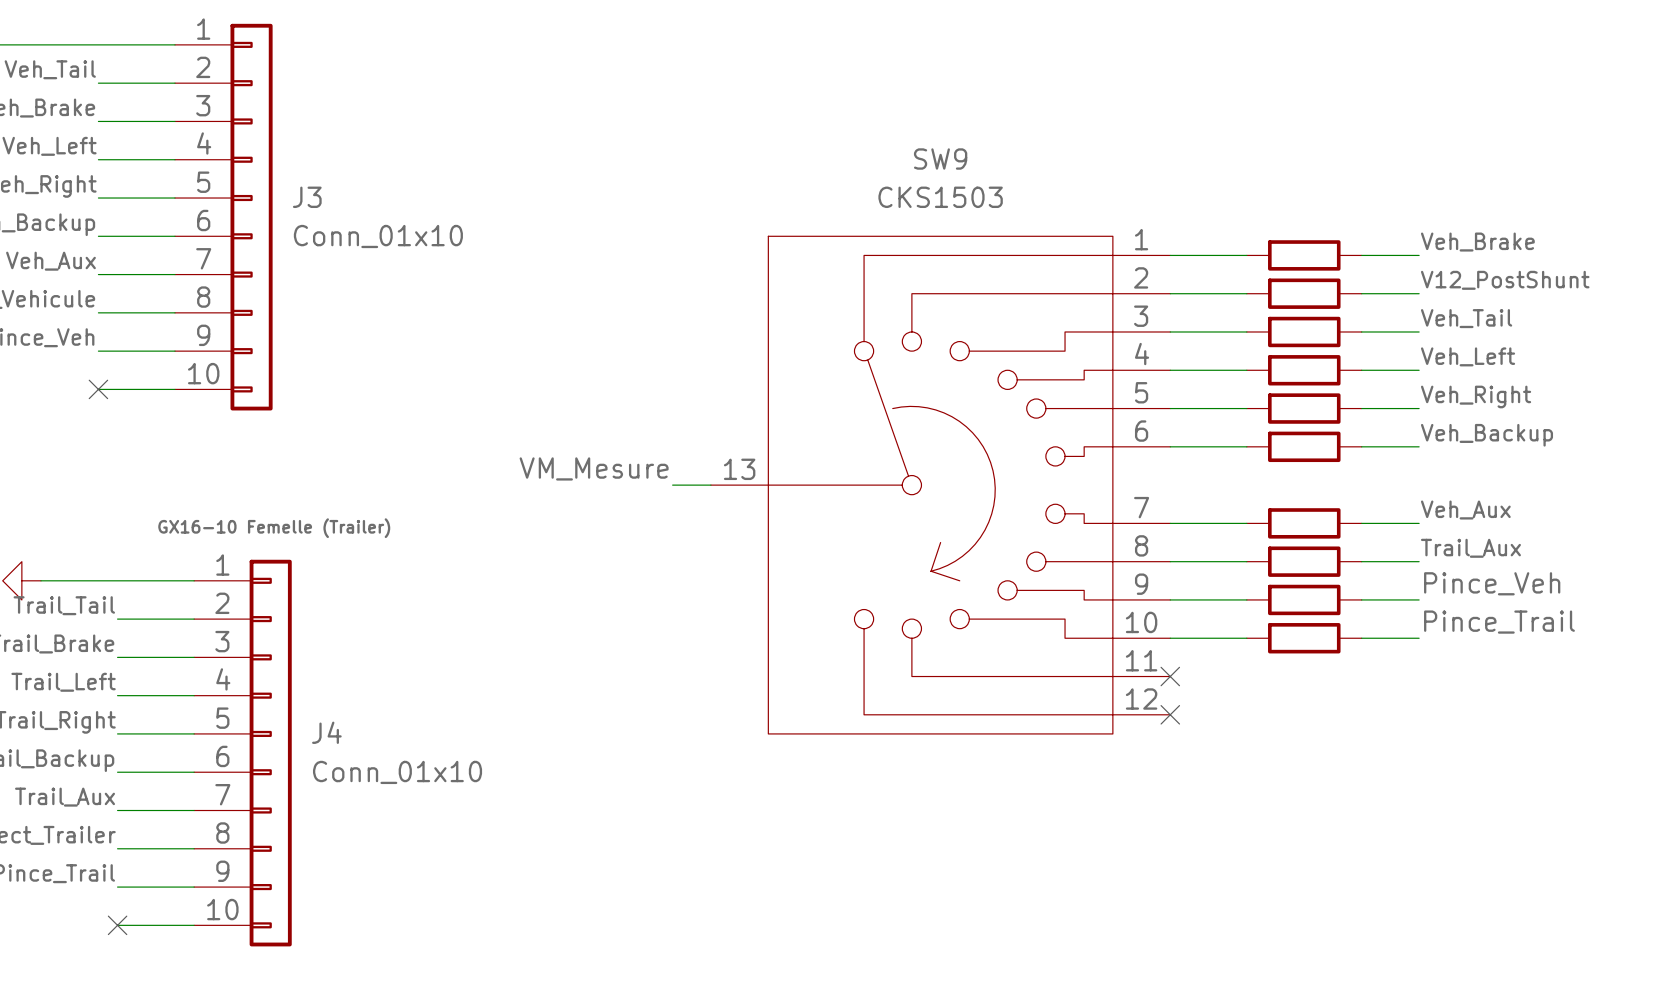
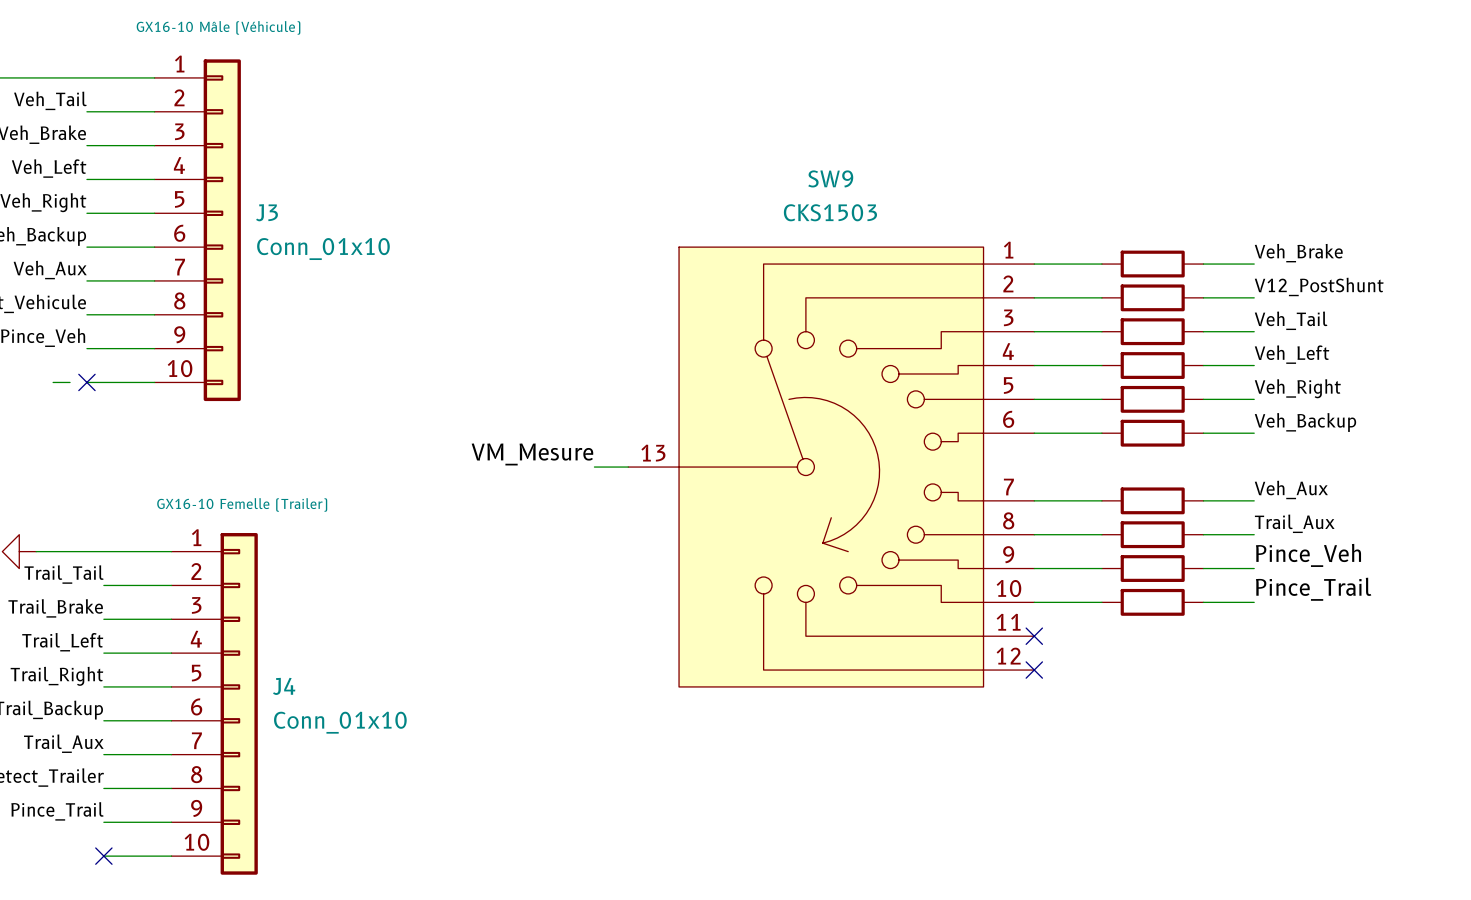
wire: none -> (53, 382) (70, 382)

